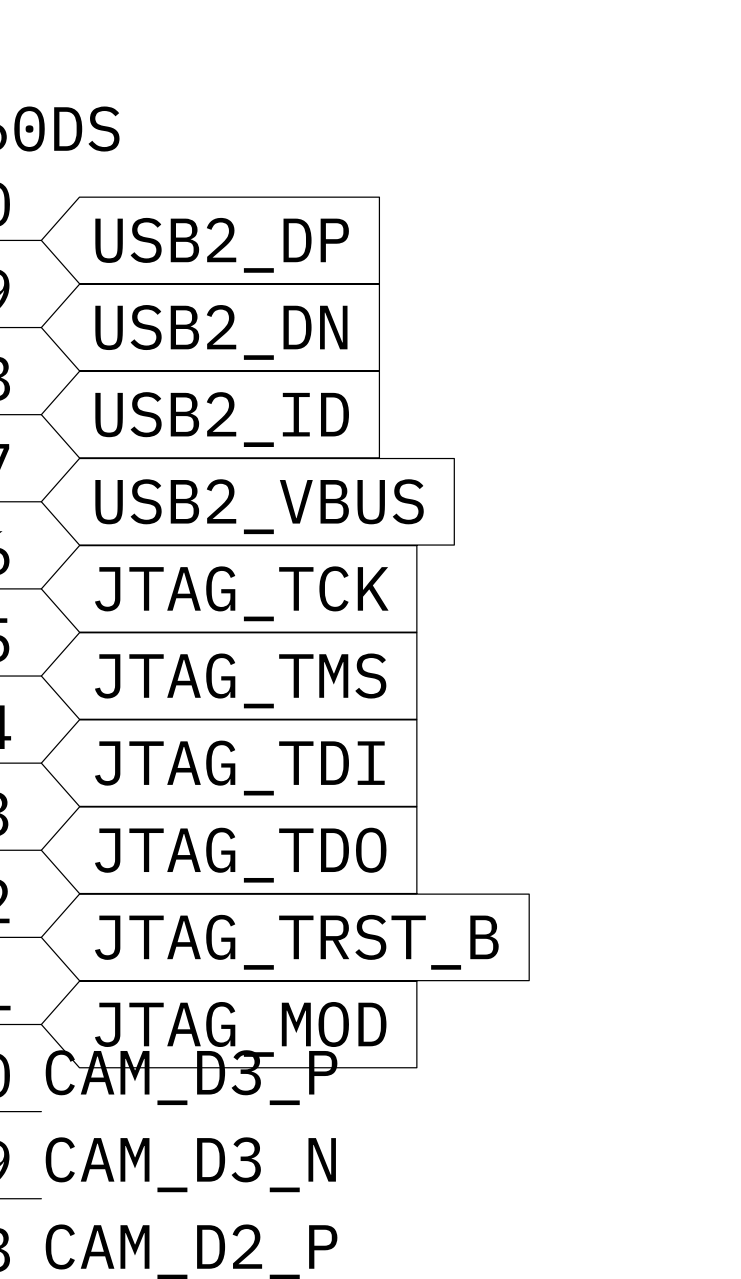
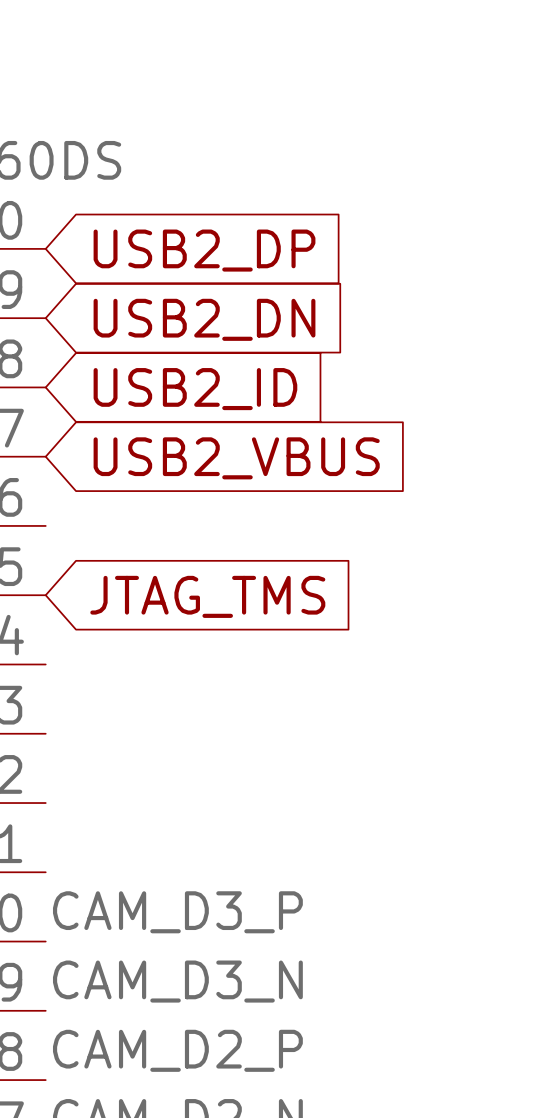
global label: JTAG_TCK (241, 593) -> none
global label: JTAG_TDI (239, 768) -> none
global label: JTAG_TDO (240, 855) -> none
global label: JTAG_TRST_B (296, 942) -> none
global label: JTAG_MOD (240, 1029) -> none

